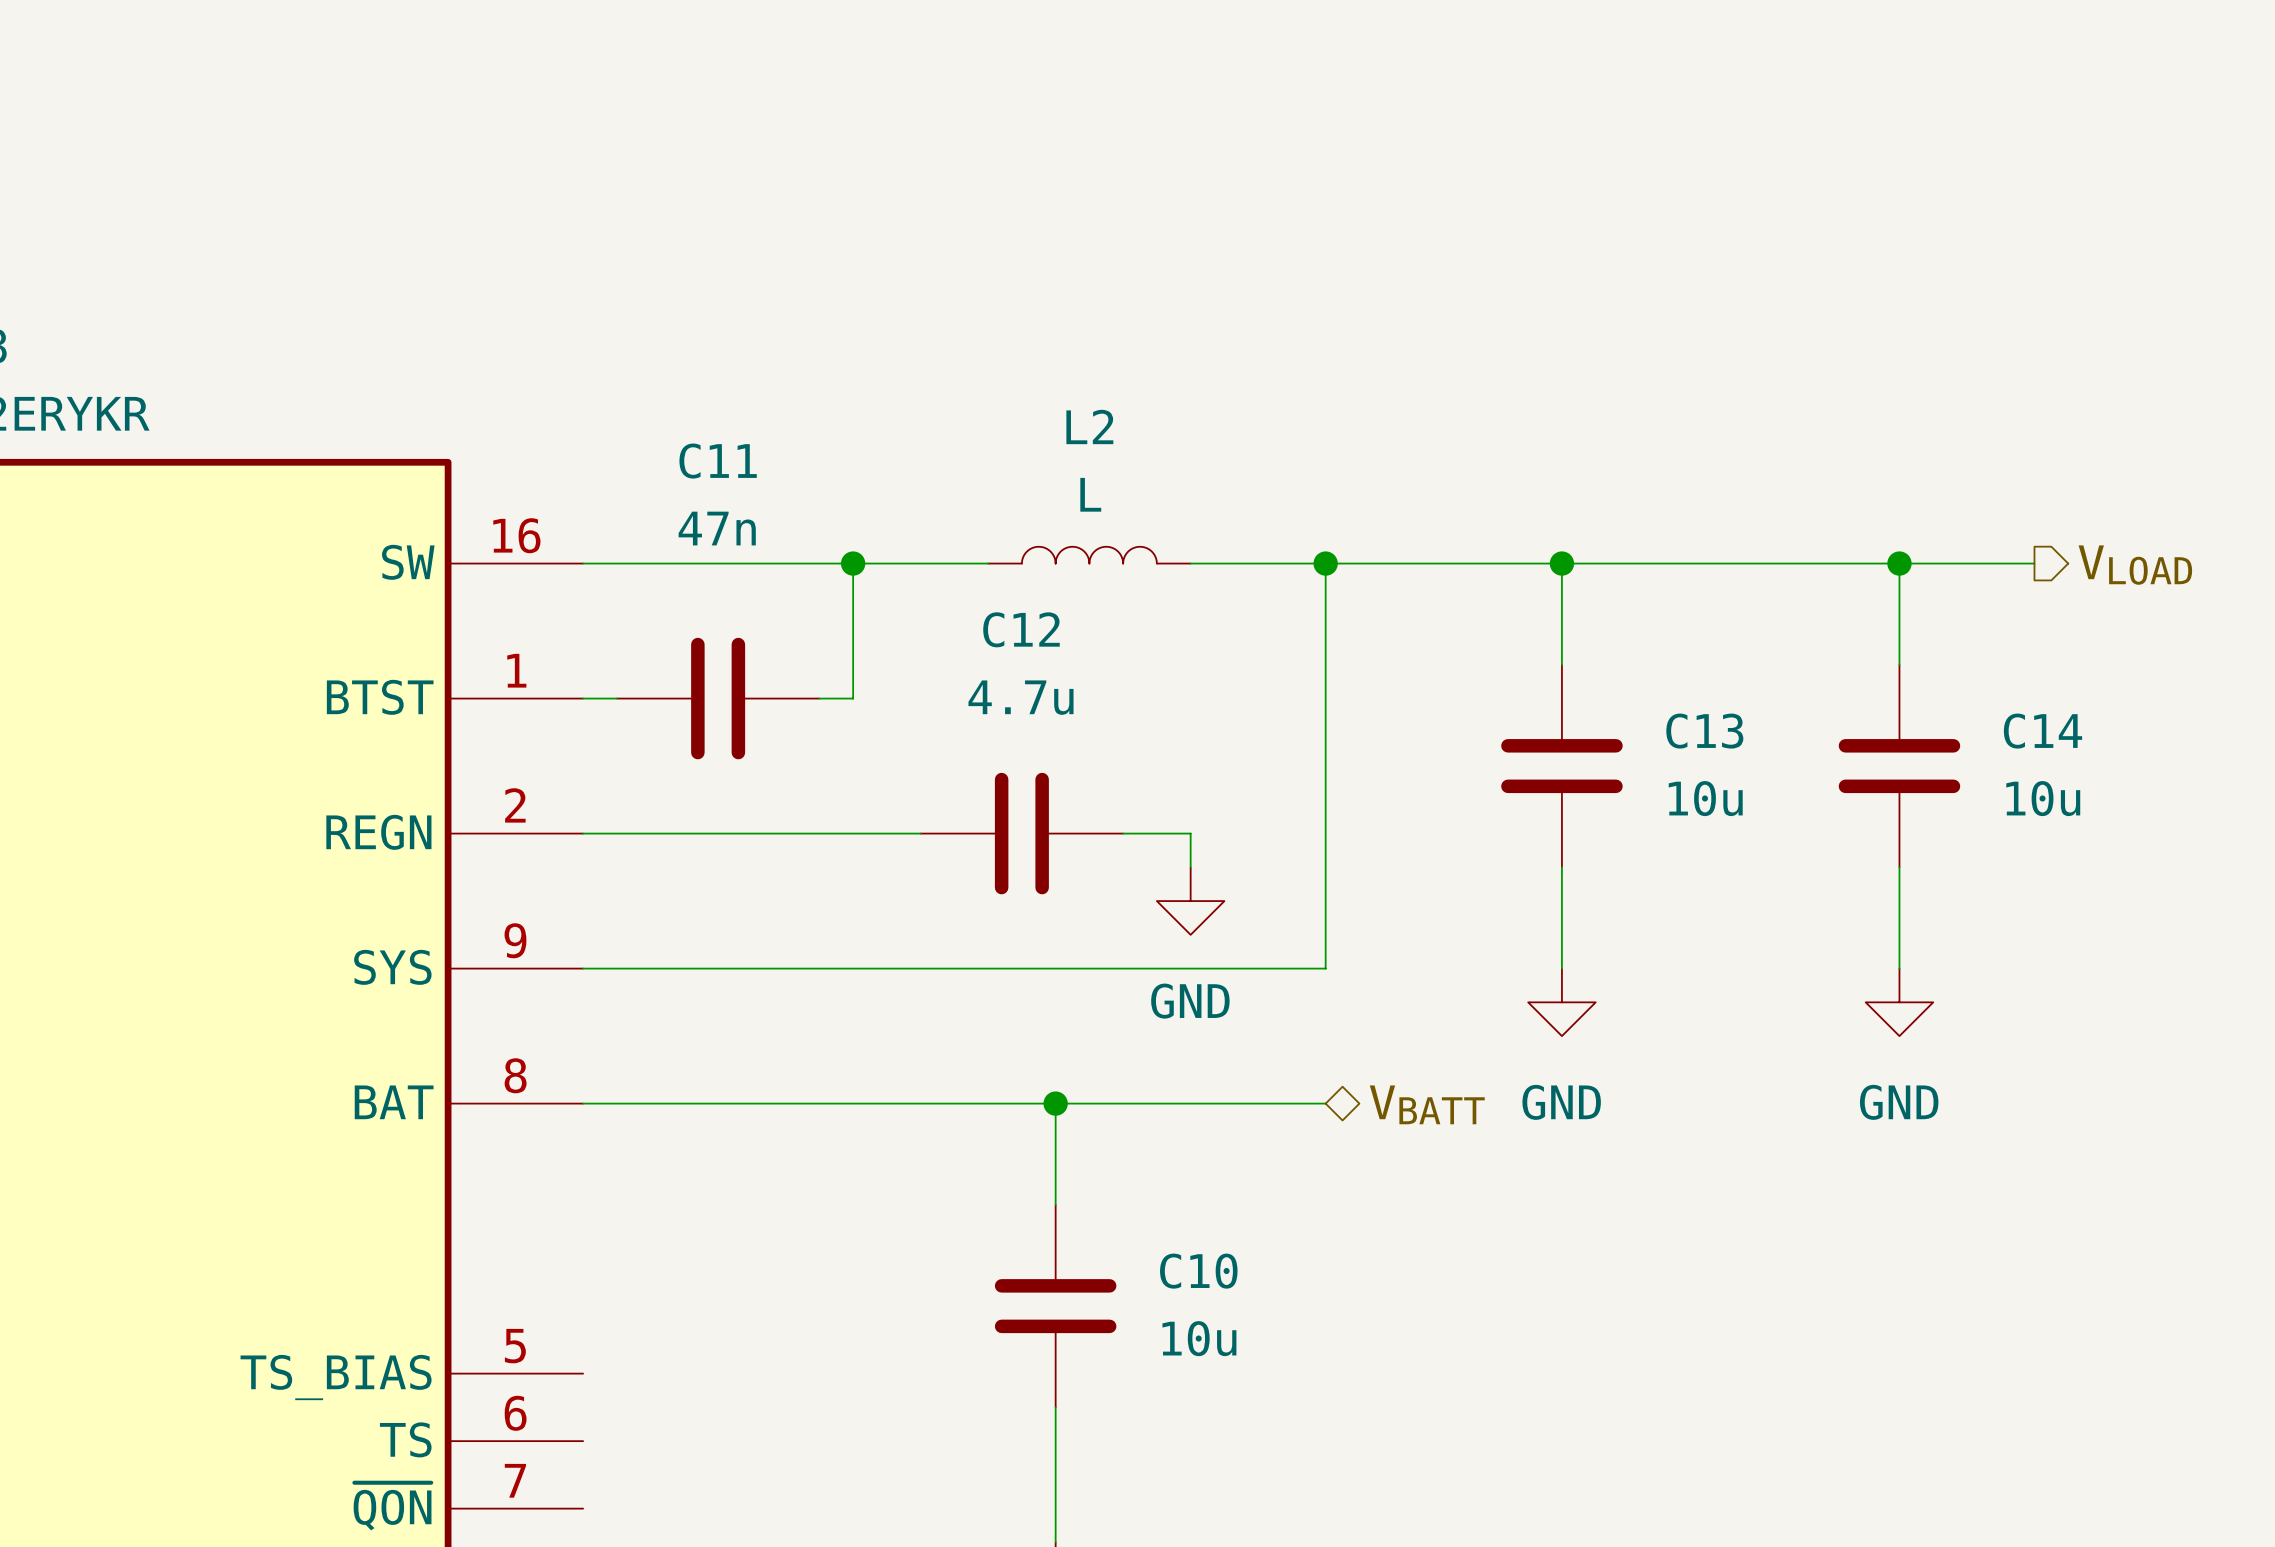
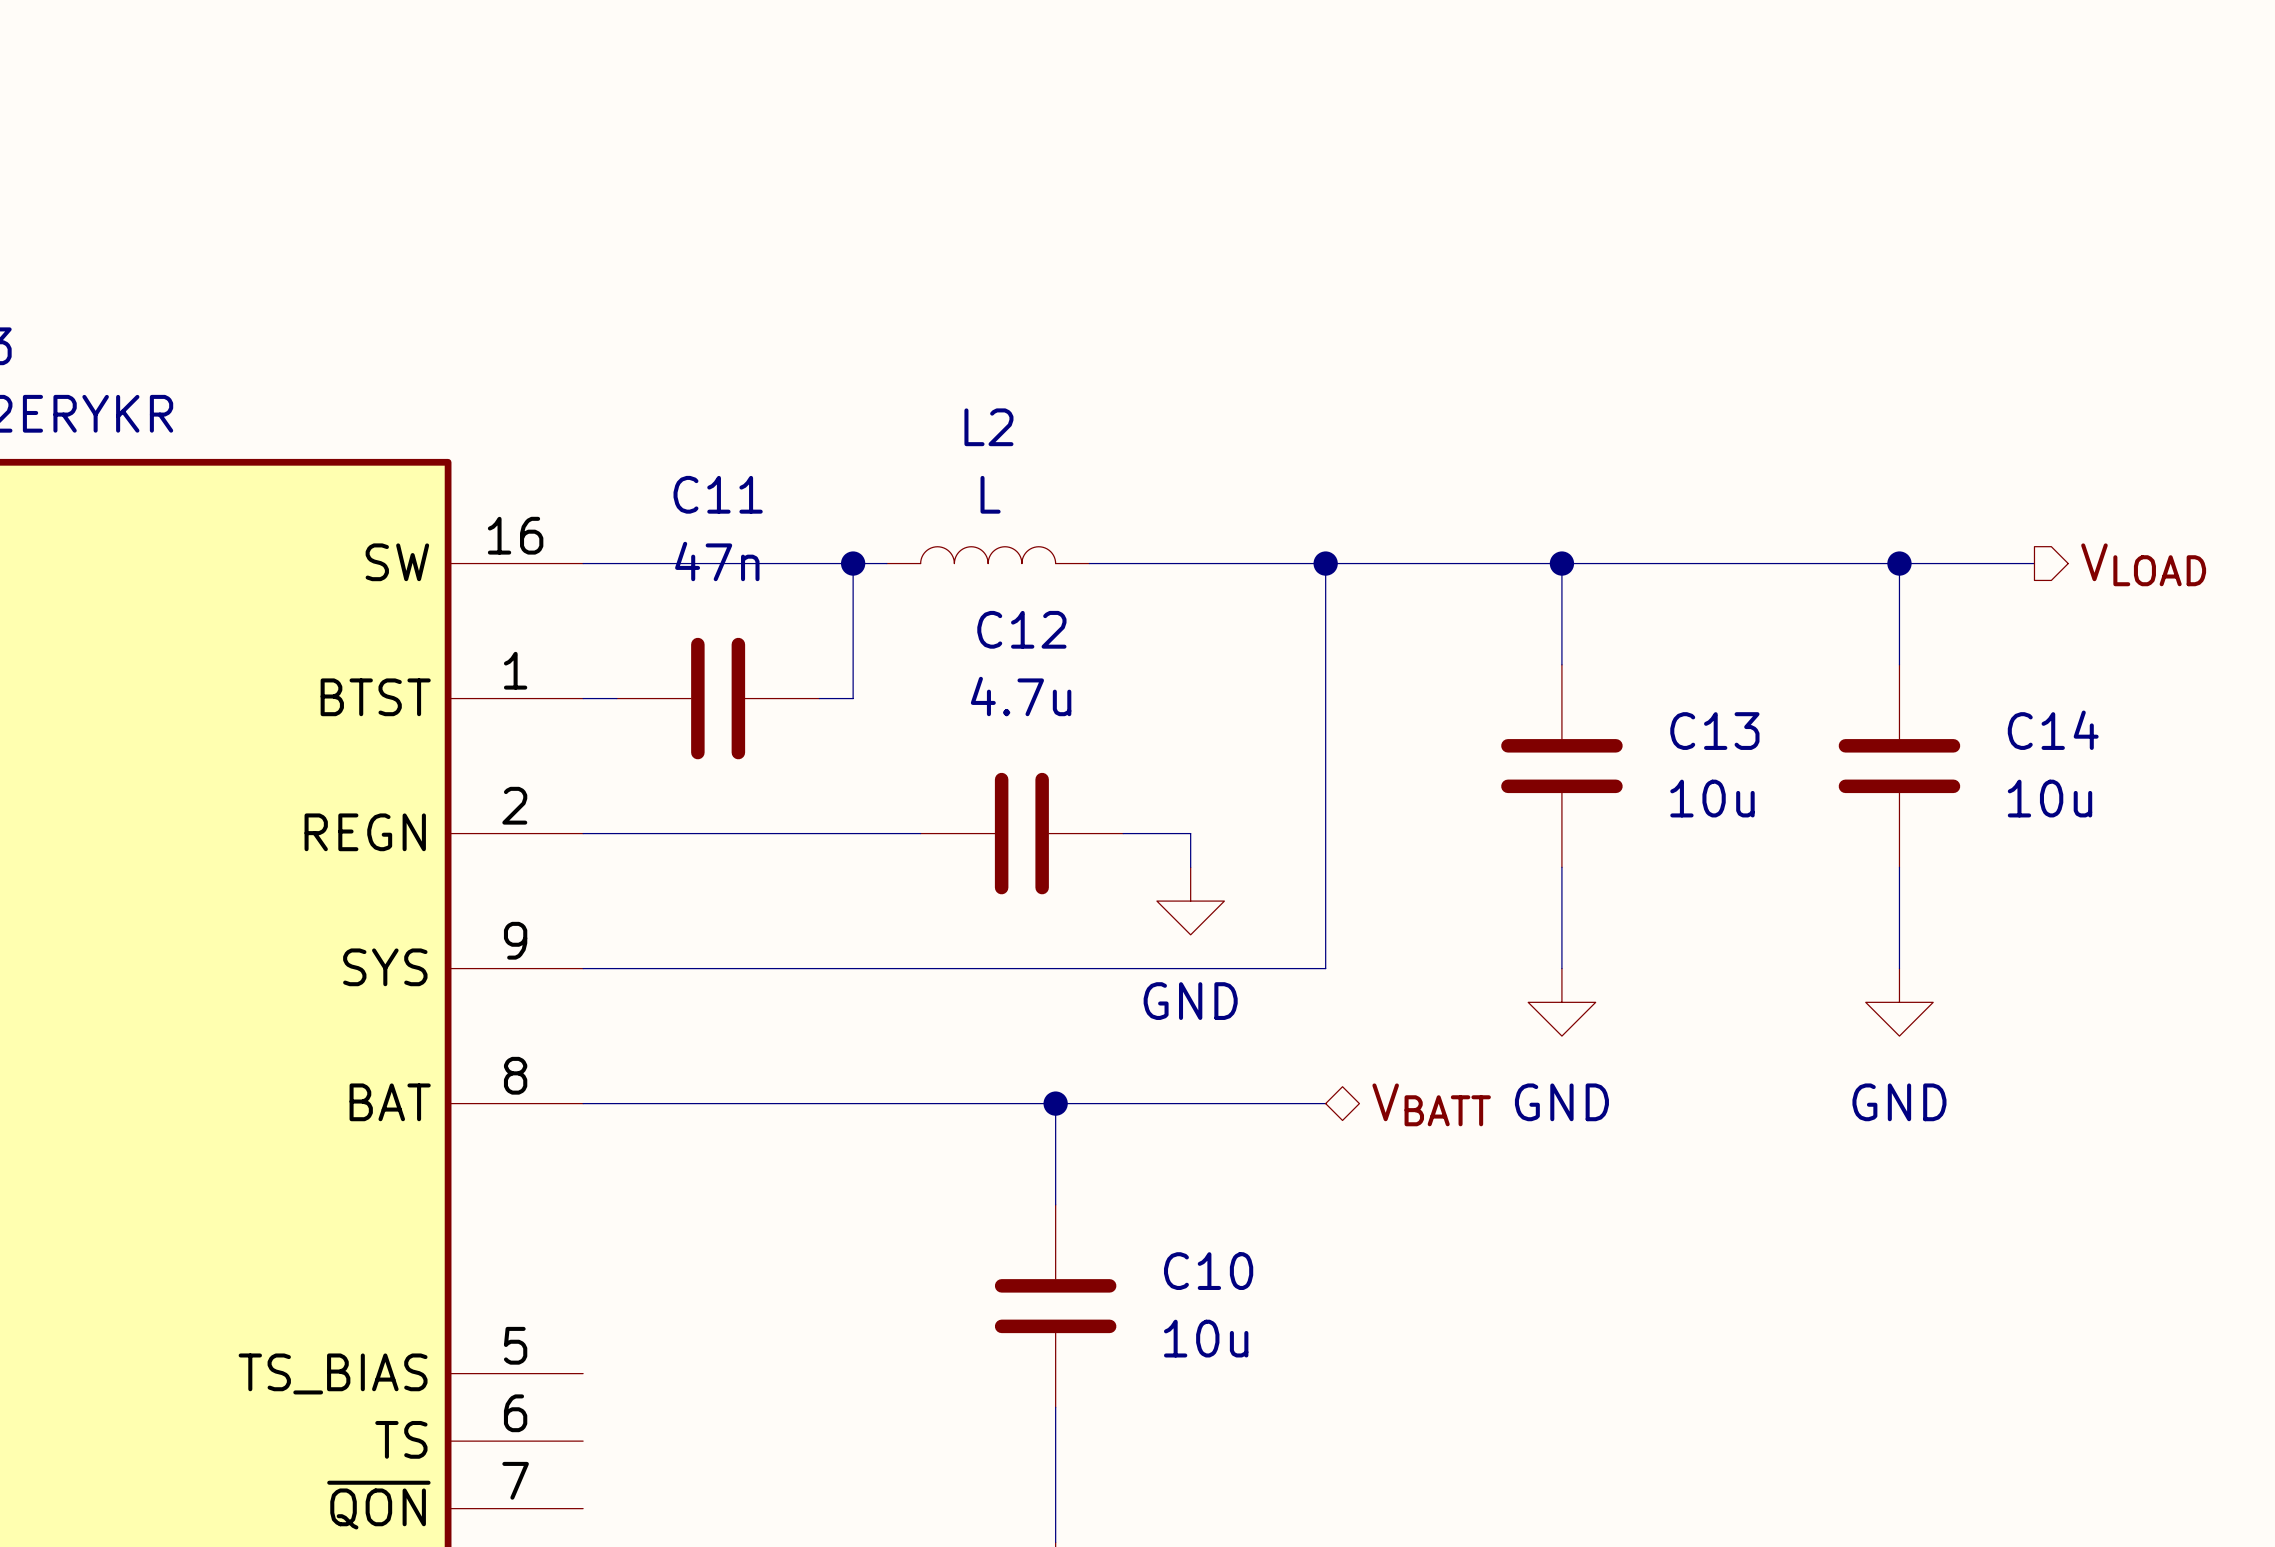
C11 name position: C11 (718, 461) -> C11 (718, 494)
C11 value position: 47n (717, 528) -> 47n (717, 561)
L2 position: (1089, 555) -> (988, 555)
wire: (886, 563) (988, 563) -> (1089, 563) (1190, 563)

